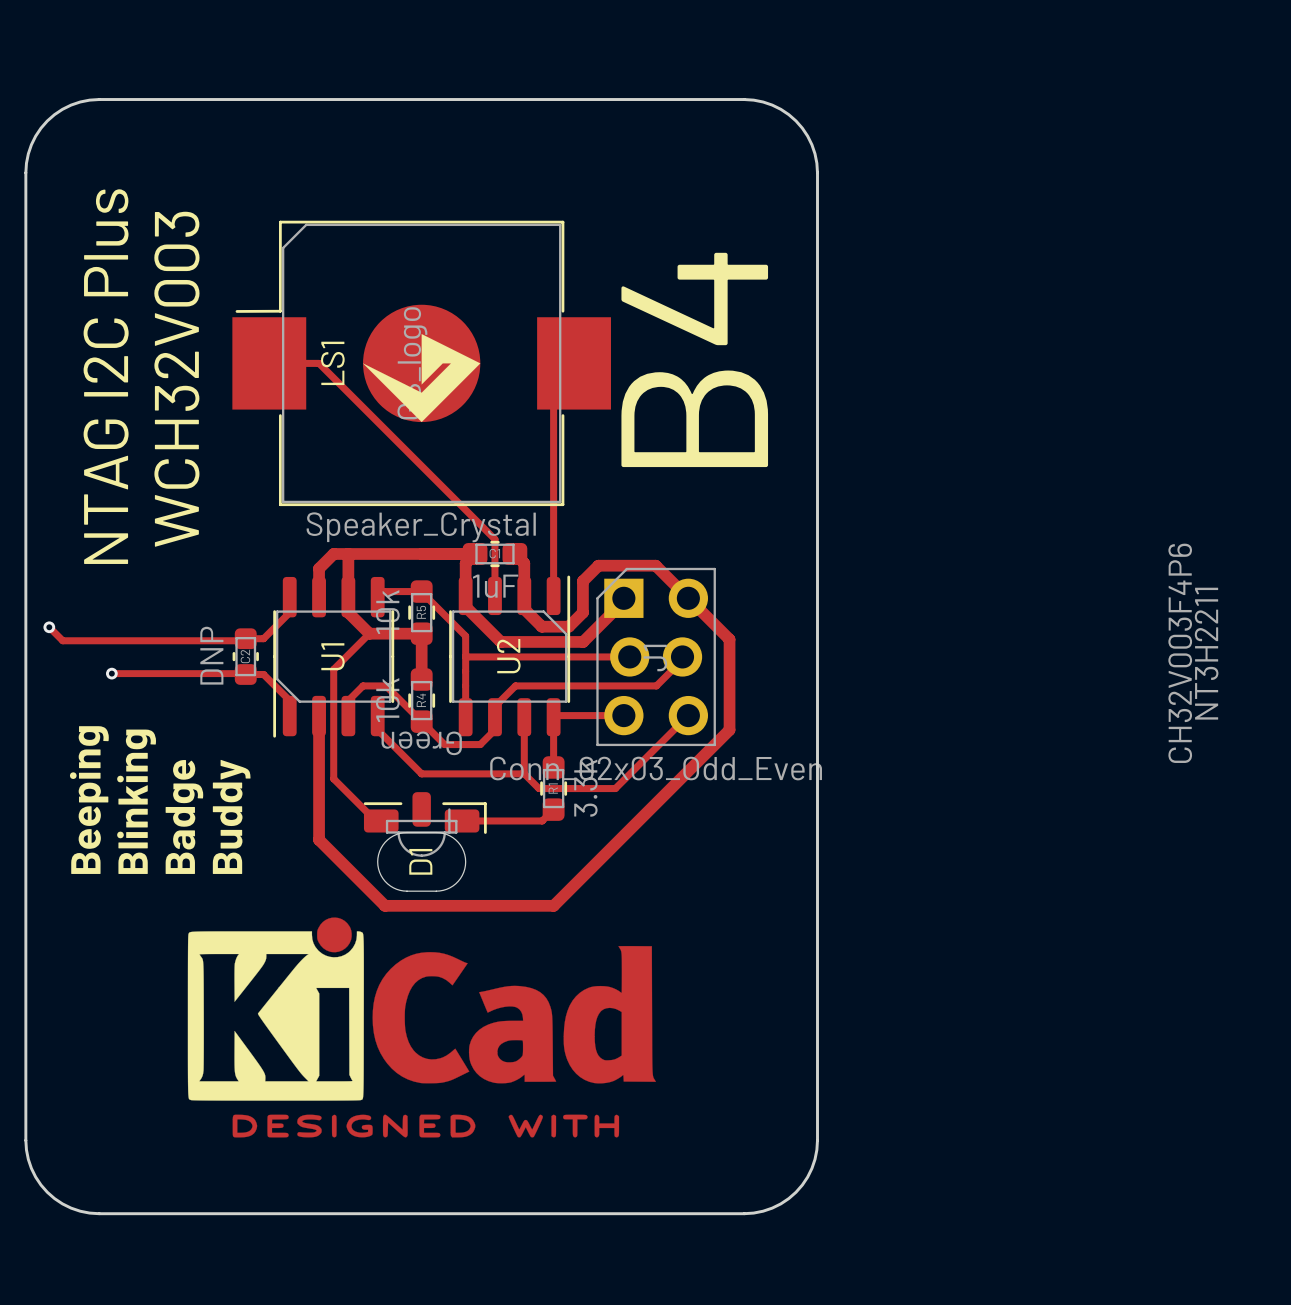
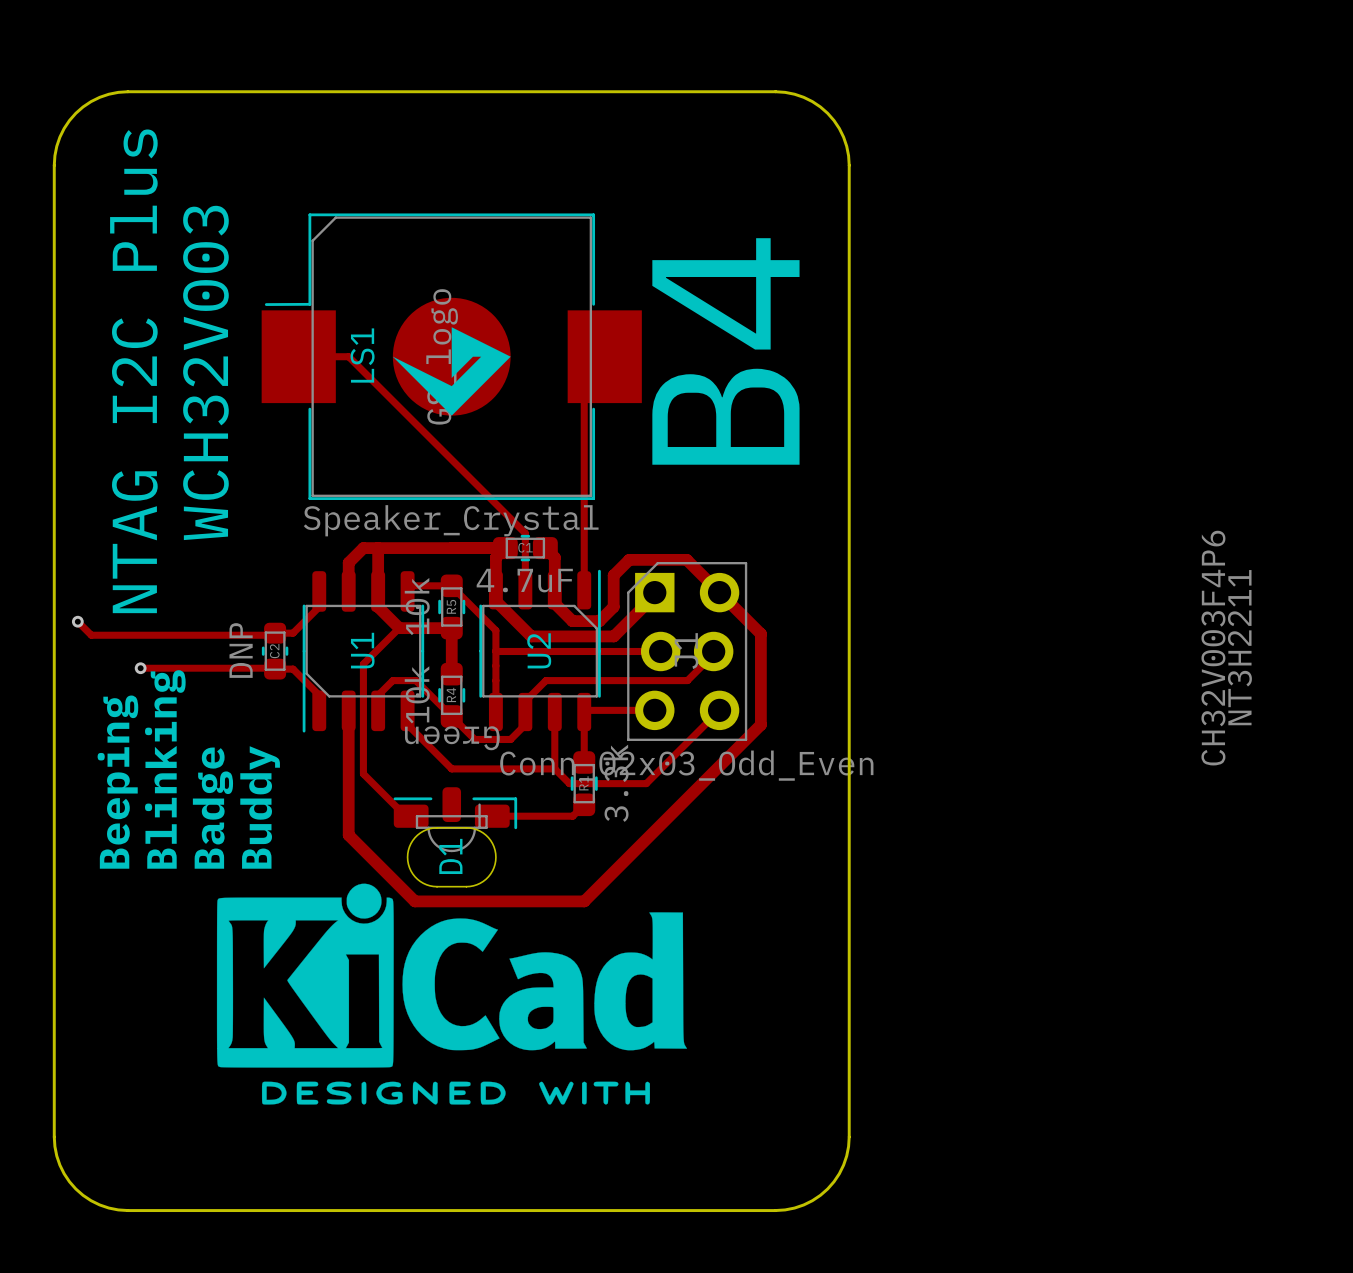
C1 value: 1uF (495, 586) -> 4.7uF (524, 580)
drawing: none -> [216, 883, 688, 1105]
drawing: [187, 917, 656, 1138] -> none

